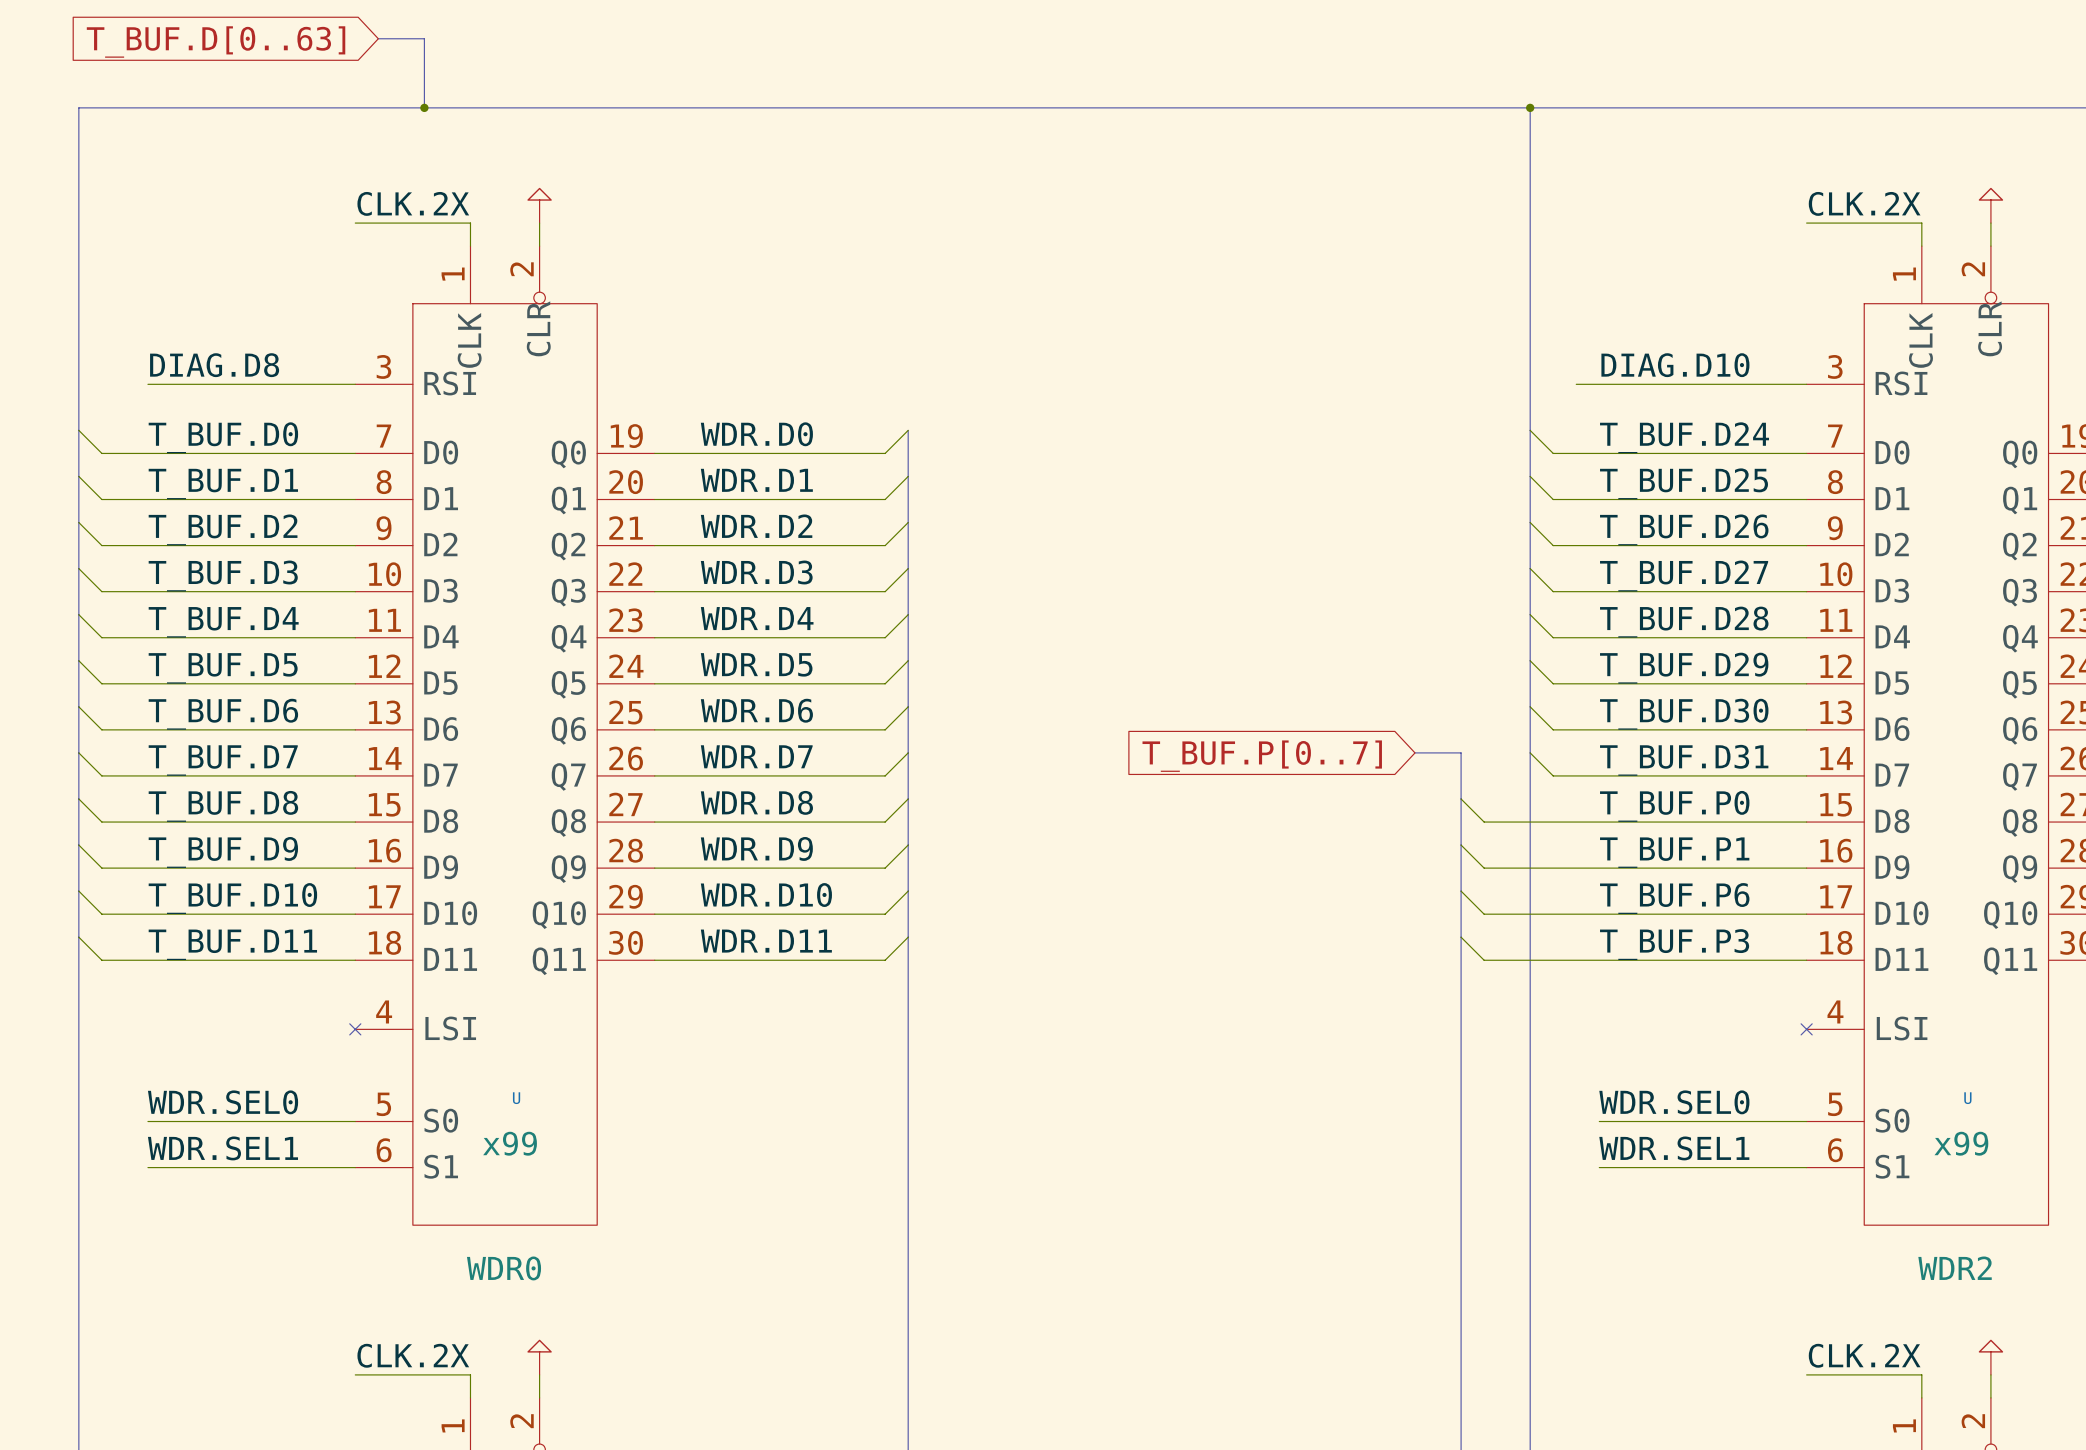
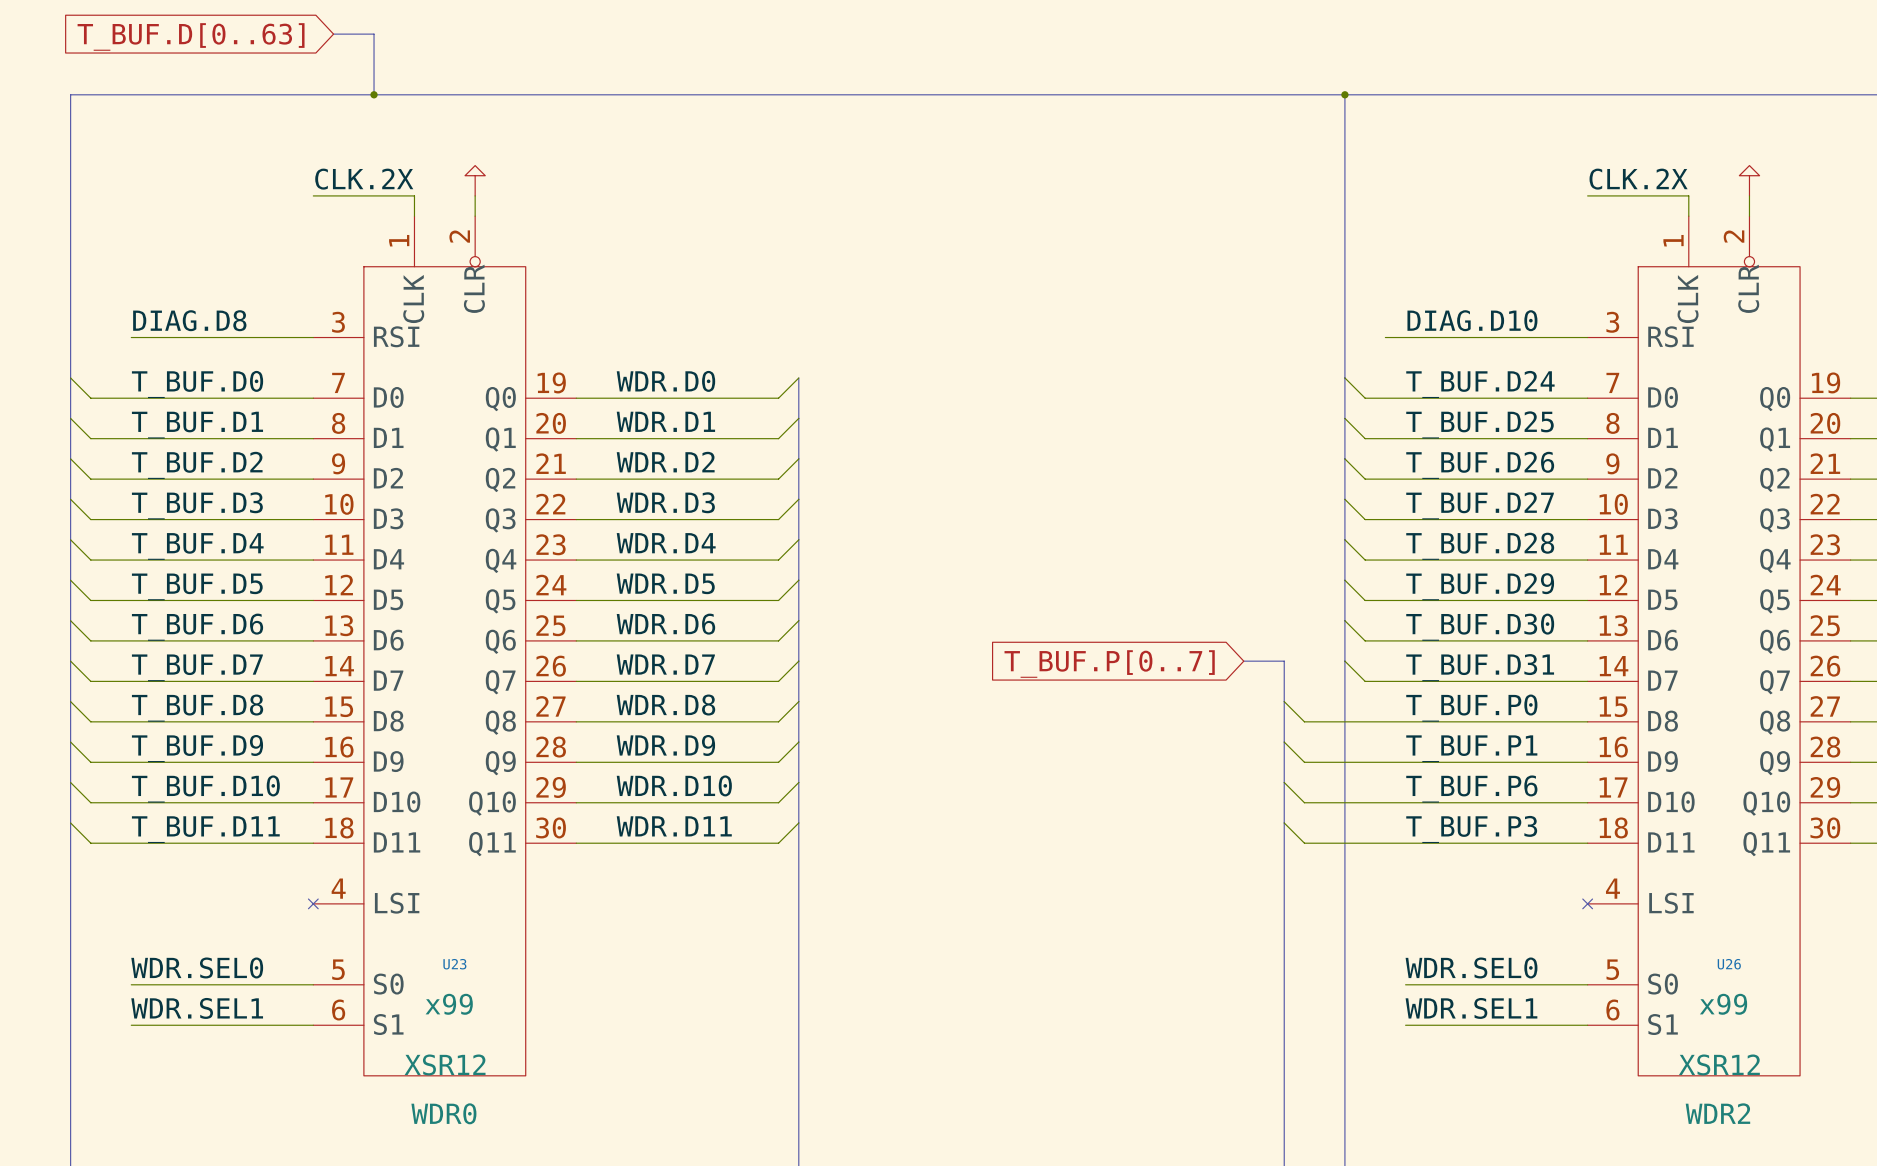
U name: U (516, 1098) -> U23 (454, 964)
U name: U (1967, 1098) -> U26 (1729, 964)
U value: none -> XSR12 (445, 1064)
U value: none -> XSR12 (1719, 1064)

